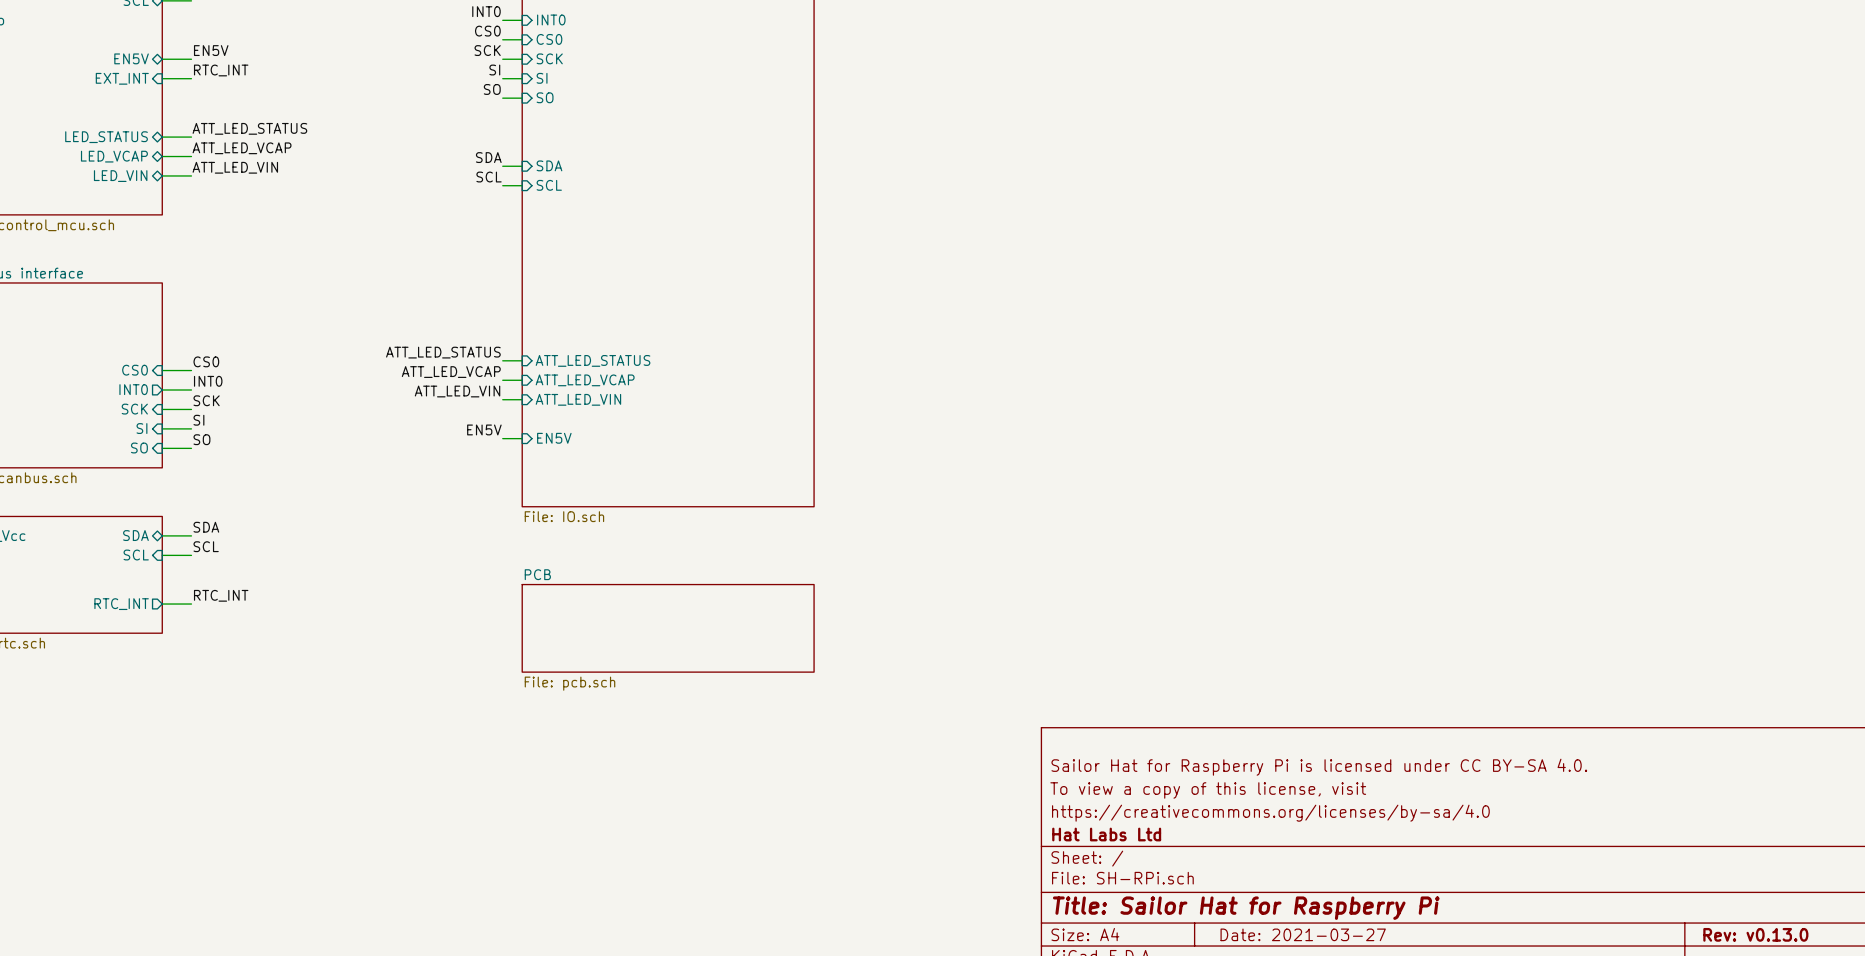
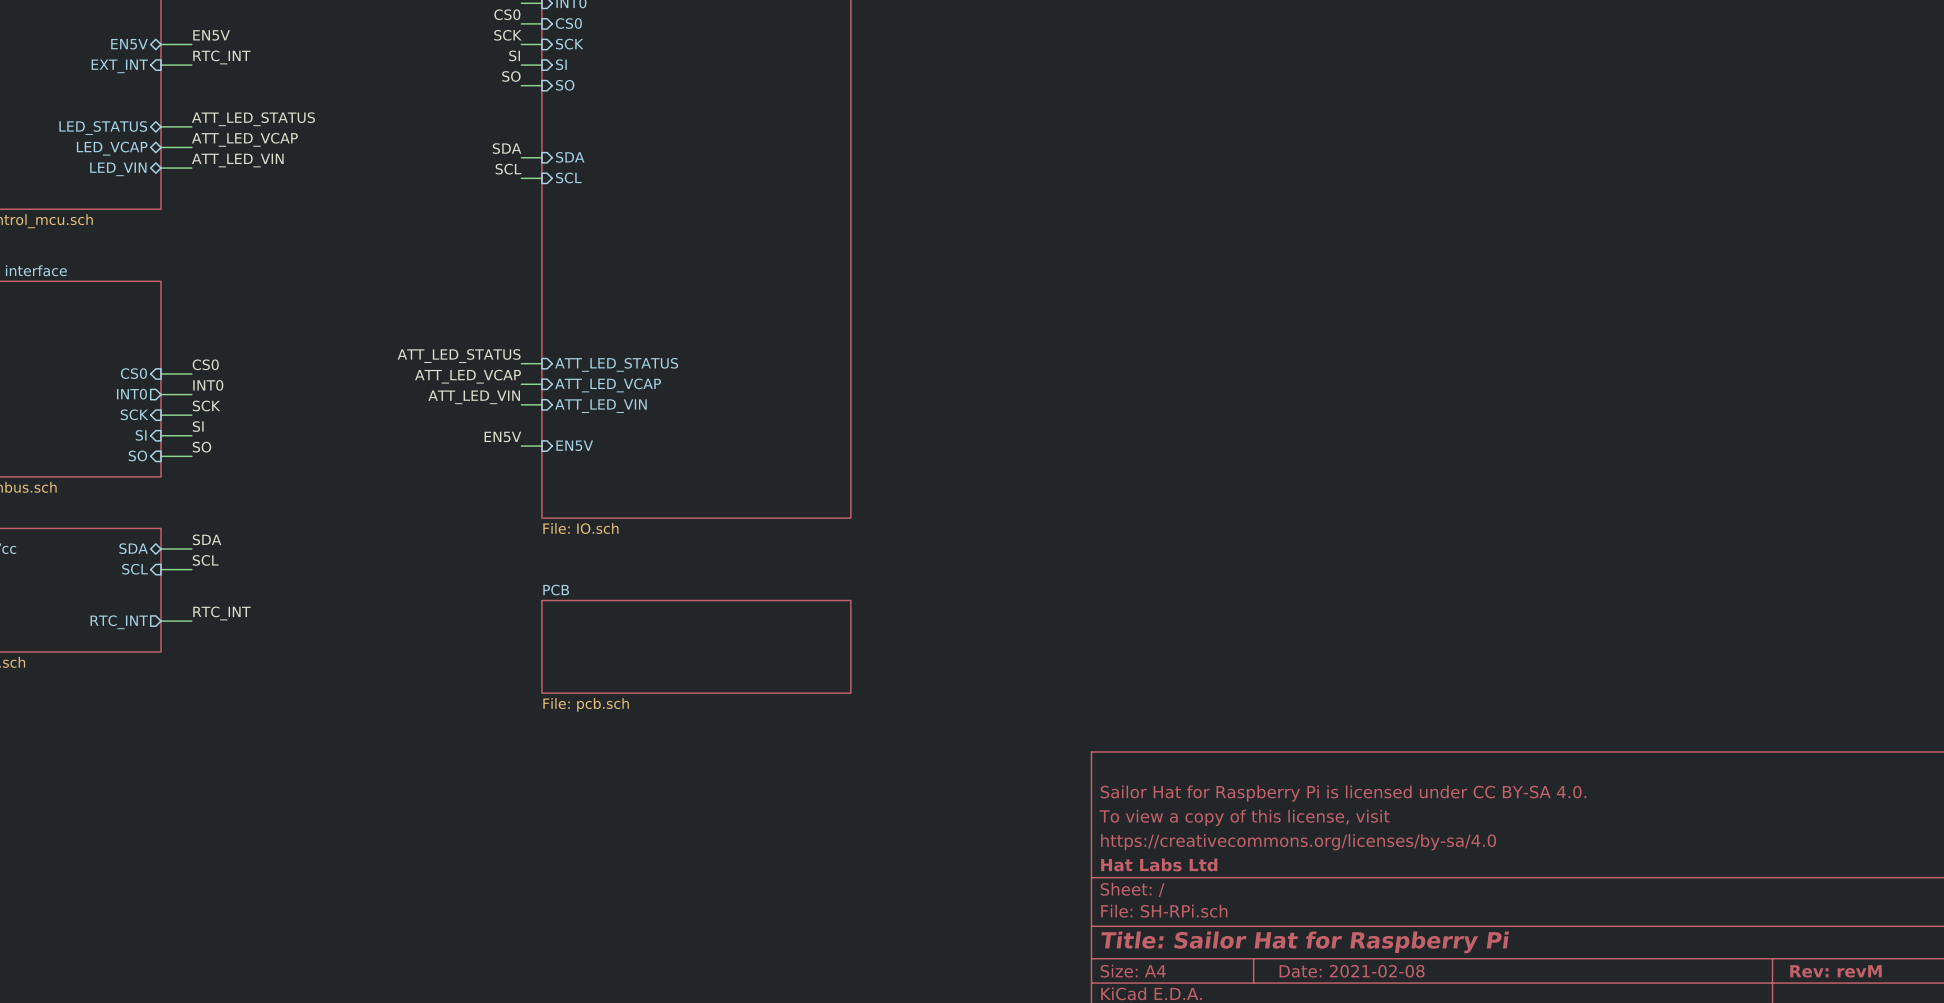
title block: Date: 2021-03-27 (1303, 934) -> Date: 2021-02-08 (1352, 971)
title block: Rev: v0.13.0 (1755, 934) -> Rev: revM (1835, 971)

